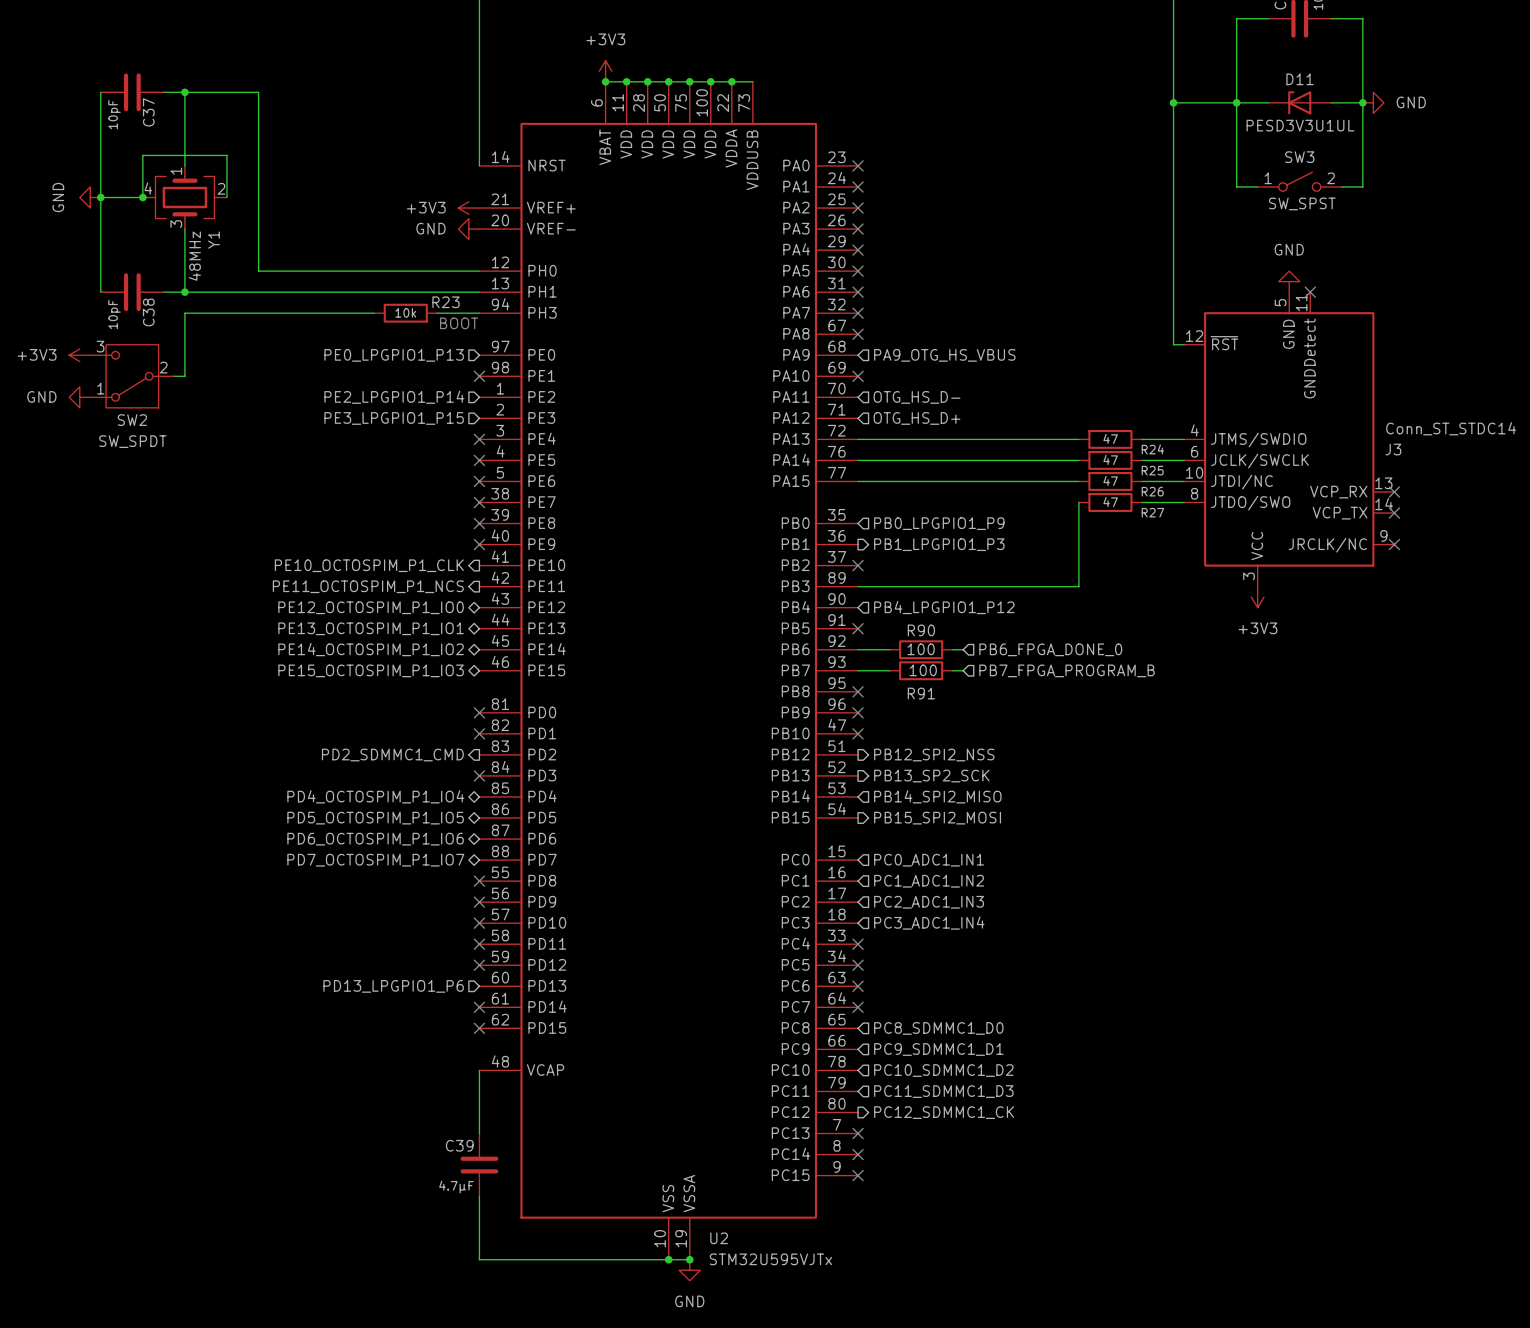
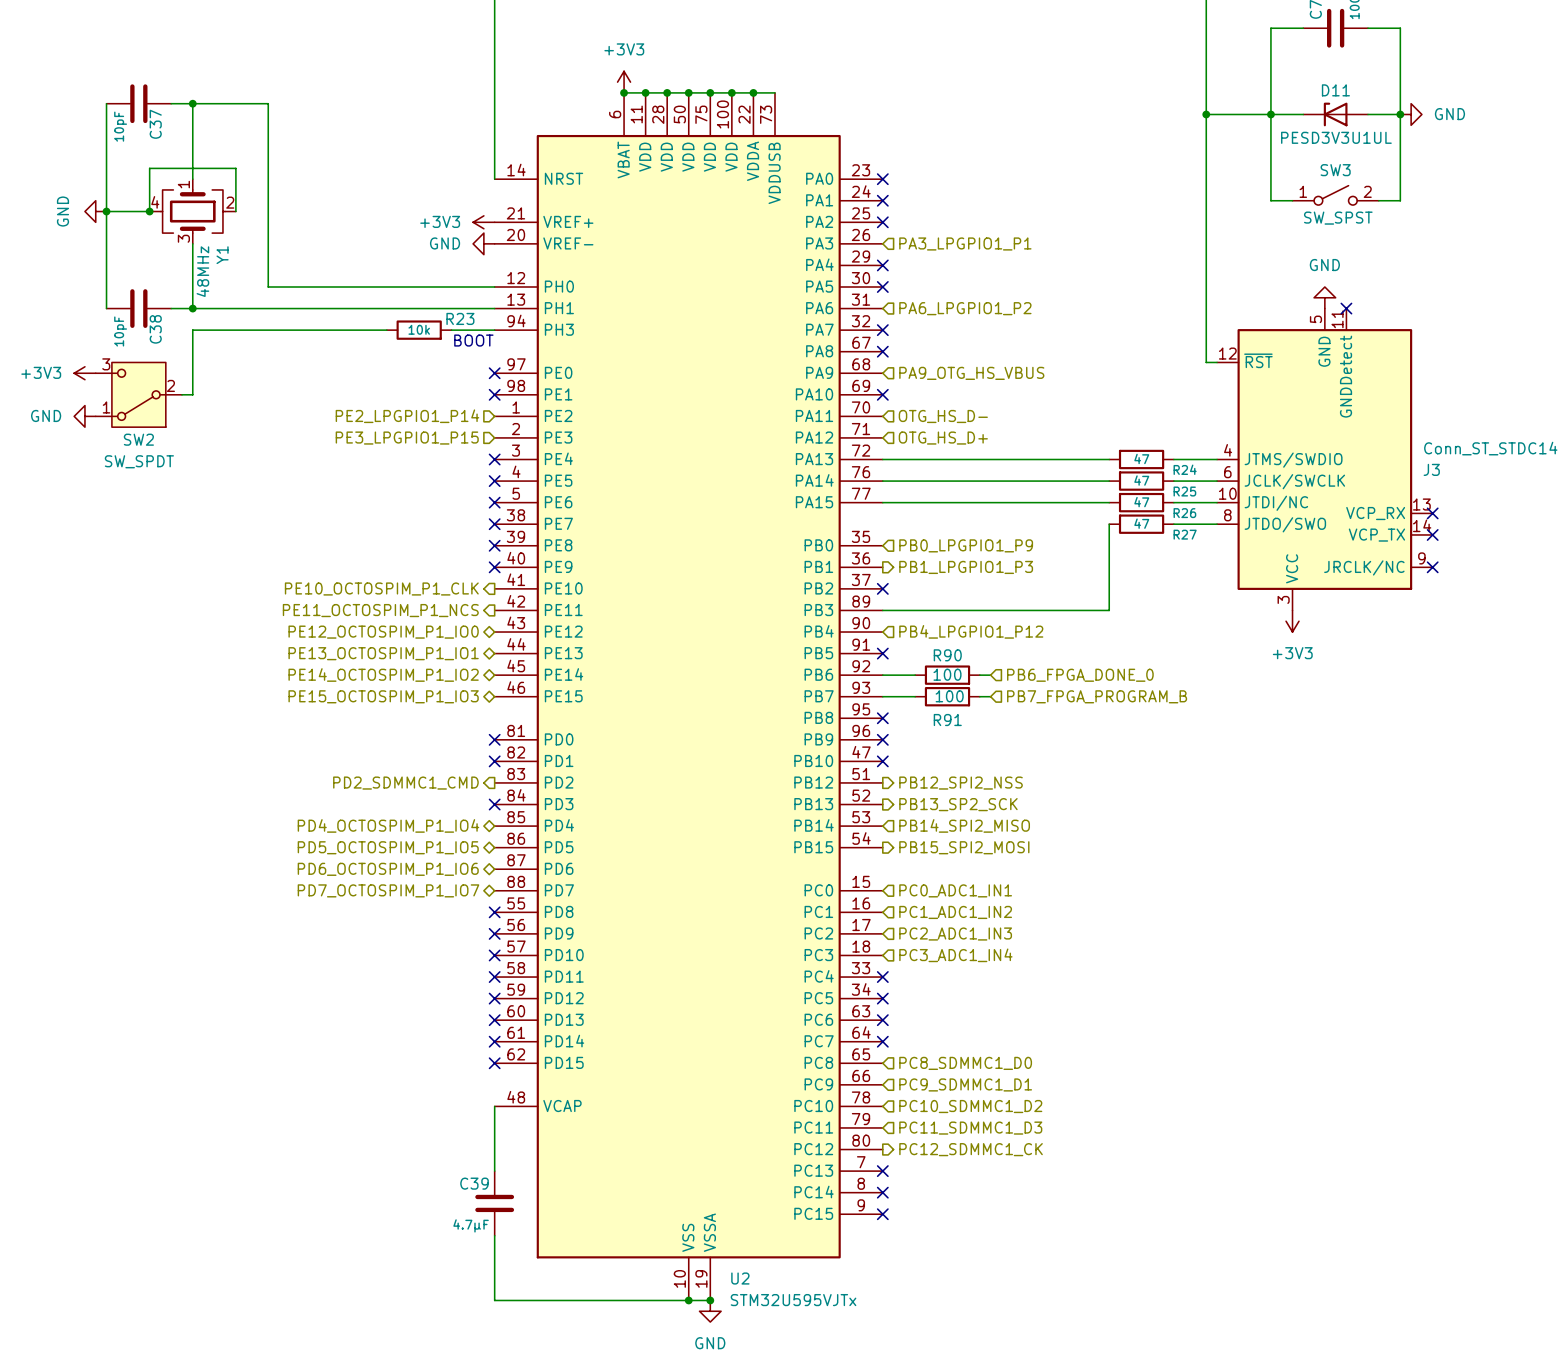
no-connect mark: (858, 229) -> none
hierarchical label: none -> PA3_LPGPIO1_P1 (965, 243)
no-connect mark: (858, 292) -> none
hierarchical label: none -> PA6_LPGPIO1_P2 (965, 308)
hierarchical label: PE0_LPGPIO1_P13 (394, 355) -> none
no-connect mark: none -> (494, 373)
hierarchical label: PD13_LPGPIO1_P6 (393, 986) -> none
no-connect mark: none -> (494, 1020)

